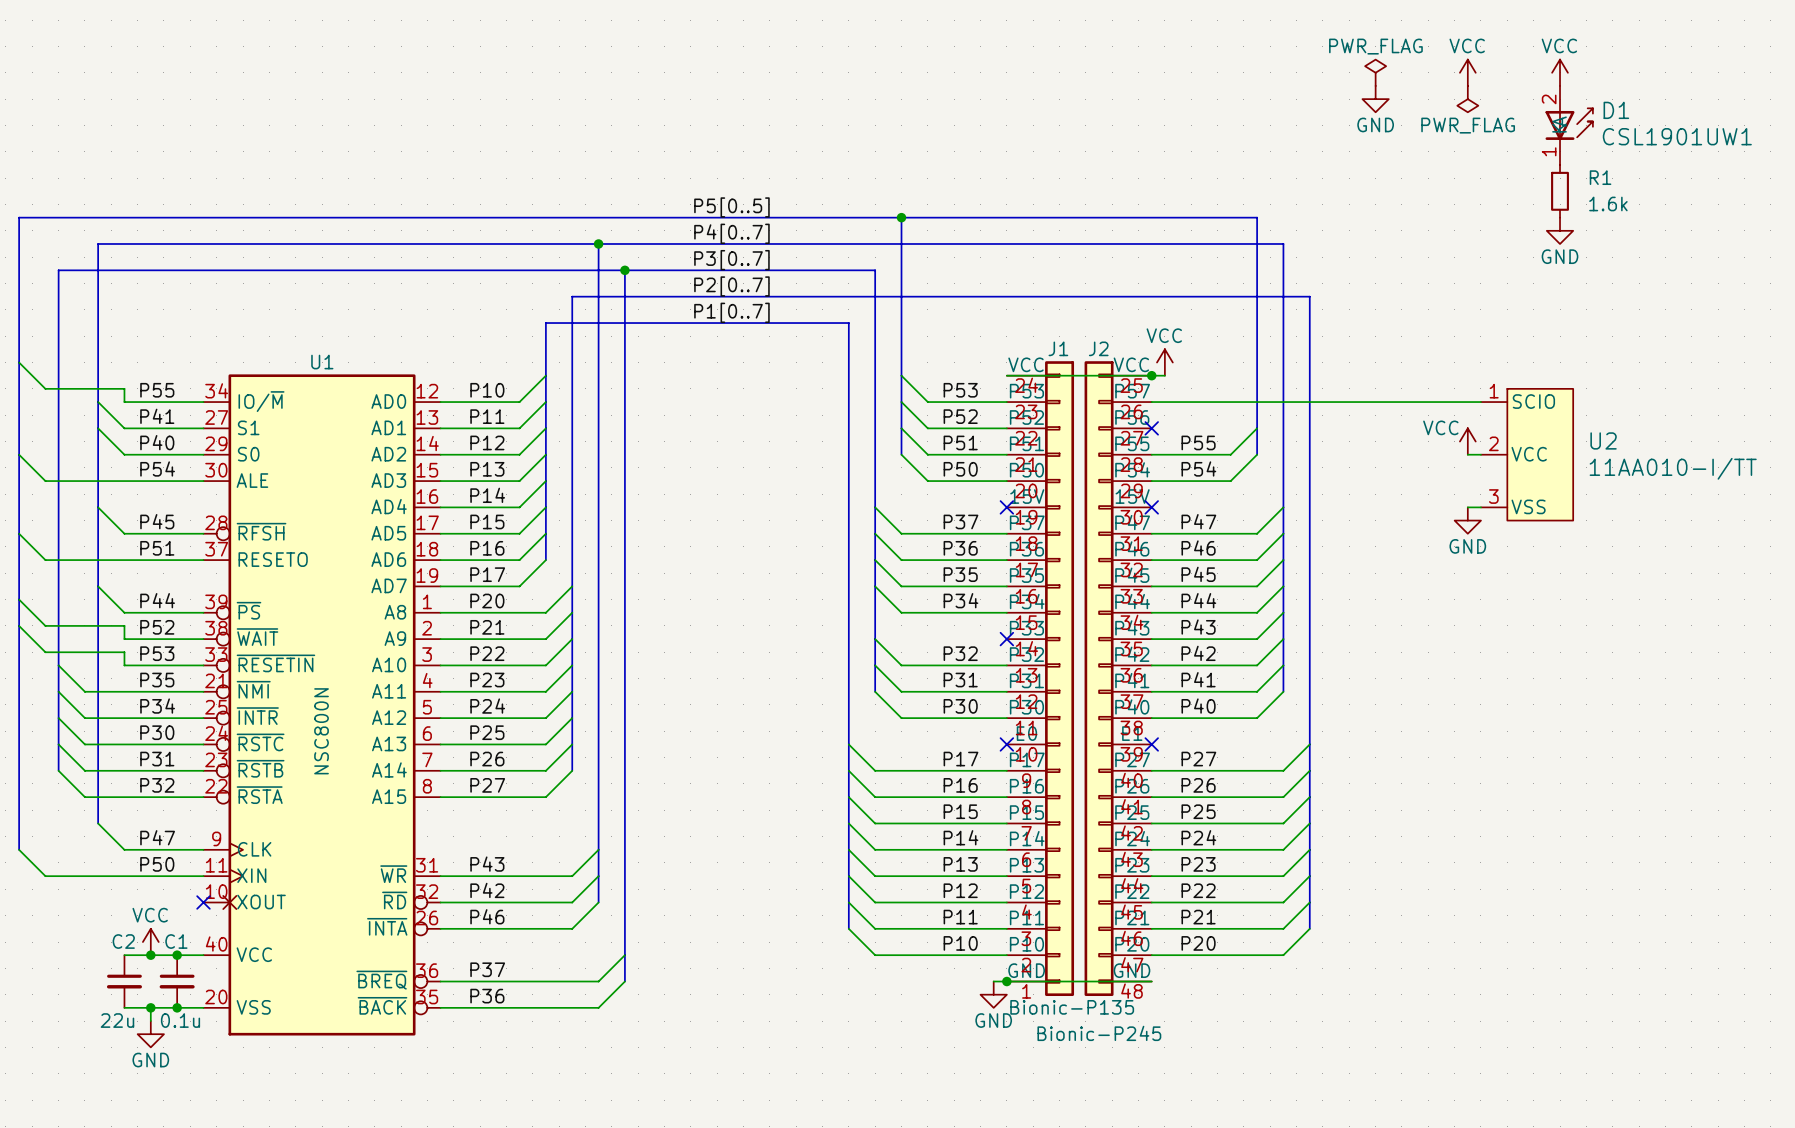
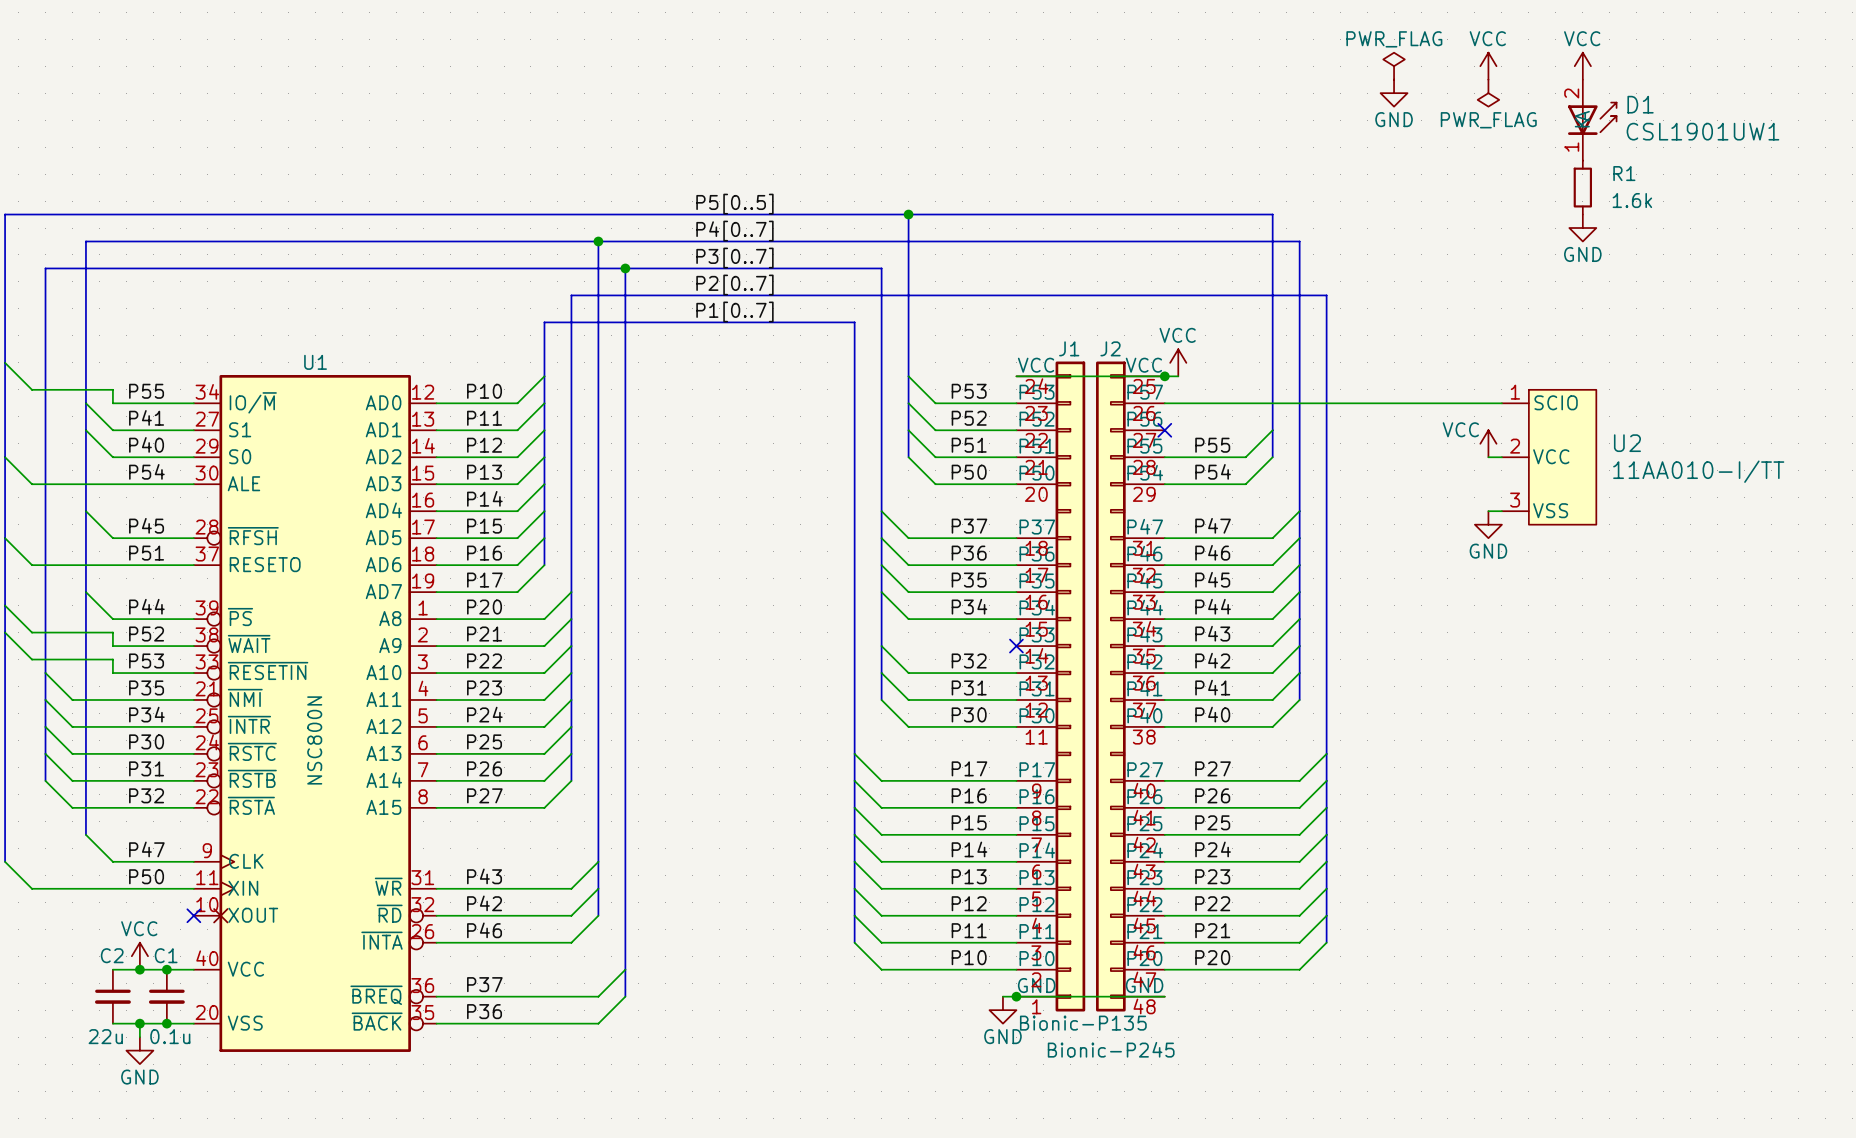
J1 symbol: [1006, 361, 1075, 997] -> [1016, 361, 1086, 1012]
J2 symbol: [1084, 361, 1152, 997] -> [1096, 361, 1165, 1012]
no-connect mark: (1006, 507) -> none
no-connect mark: (1151, 507) -> none
no-connect mark: (1006, 744) -> none
no-connect mark: (1151, 744) -> none

